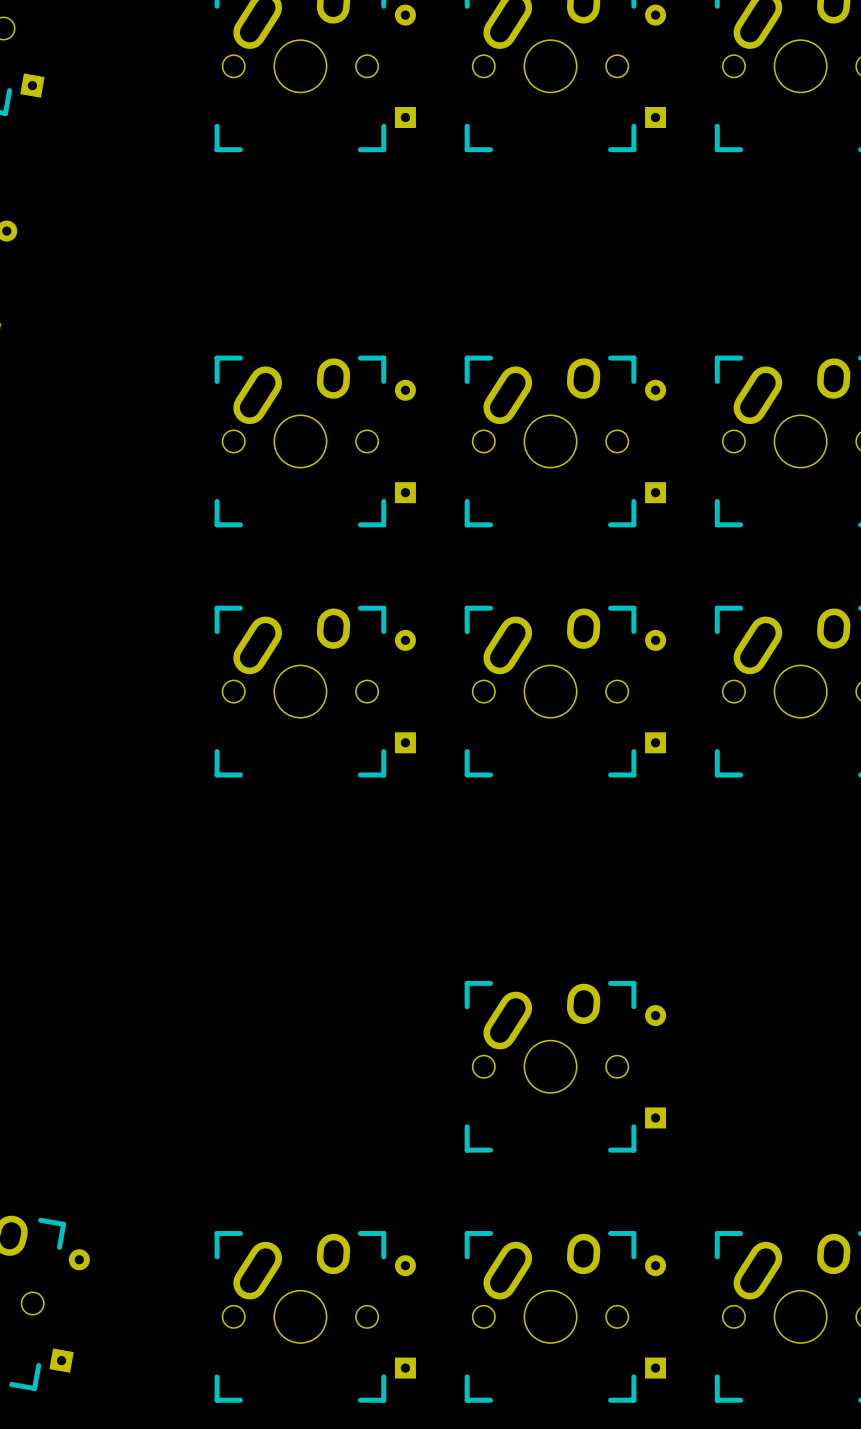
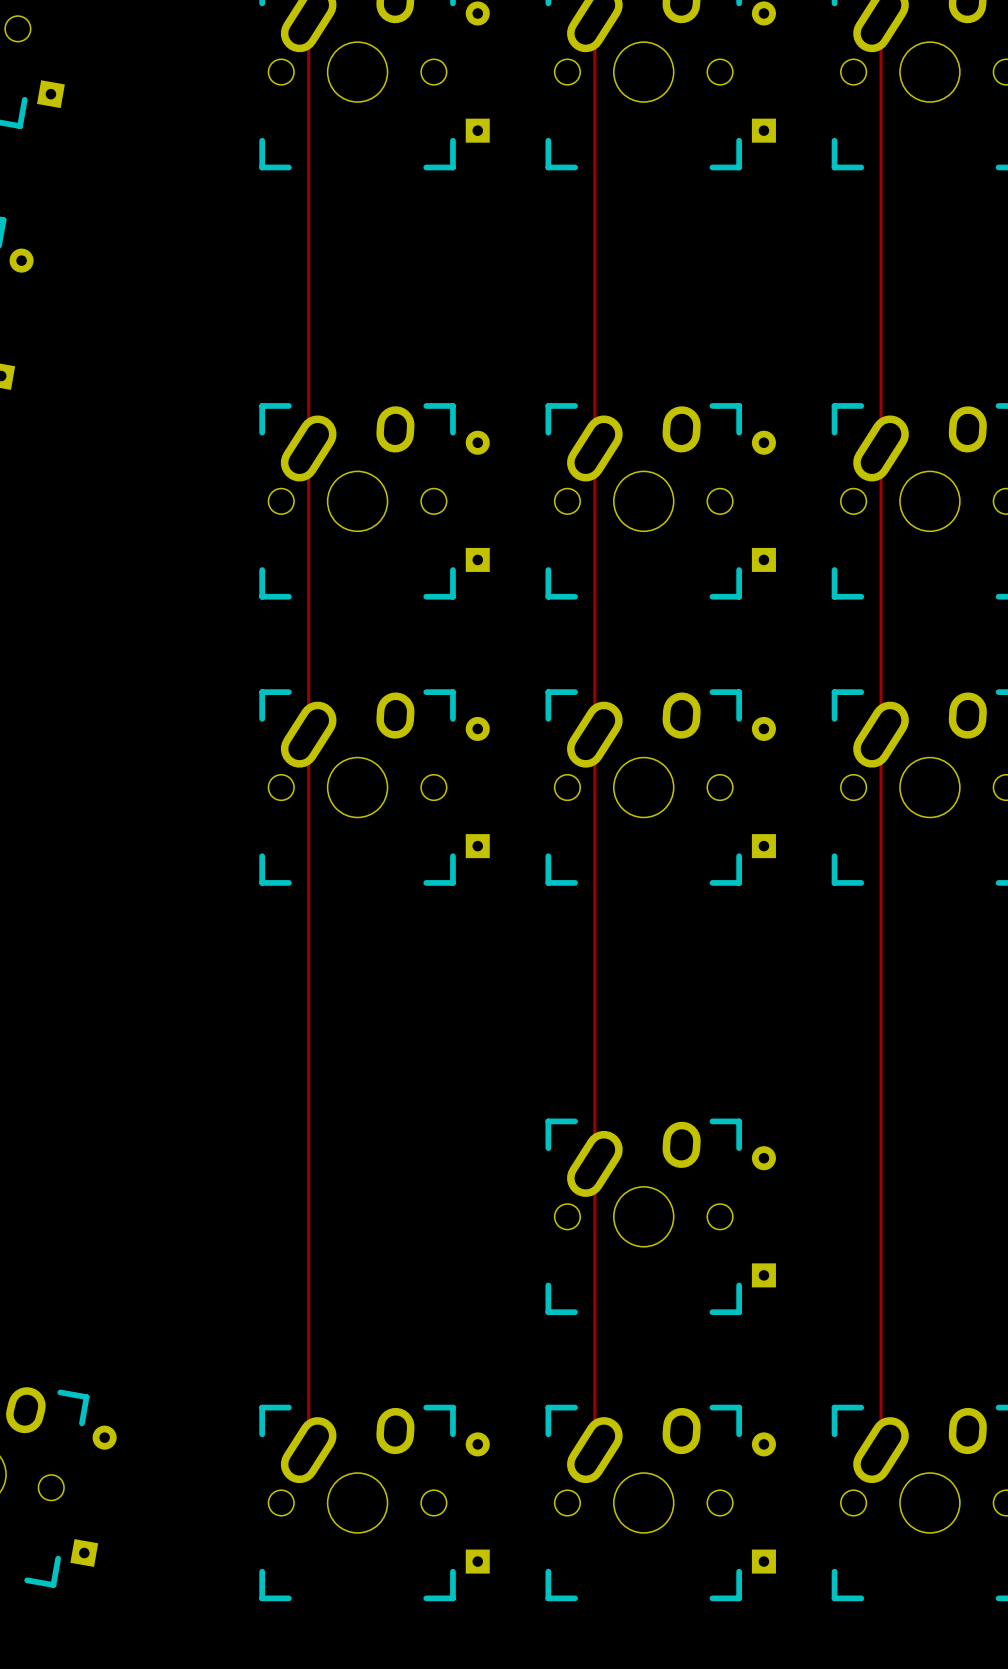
track: none -> (308, 19) (308, 1450)
track: none -> (594, 19) (594, 1450)
track: none -> (881, 19) (881, 1450)

